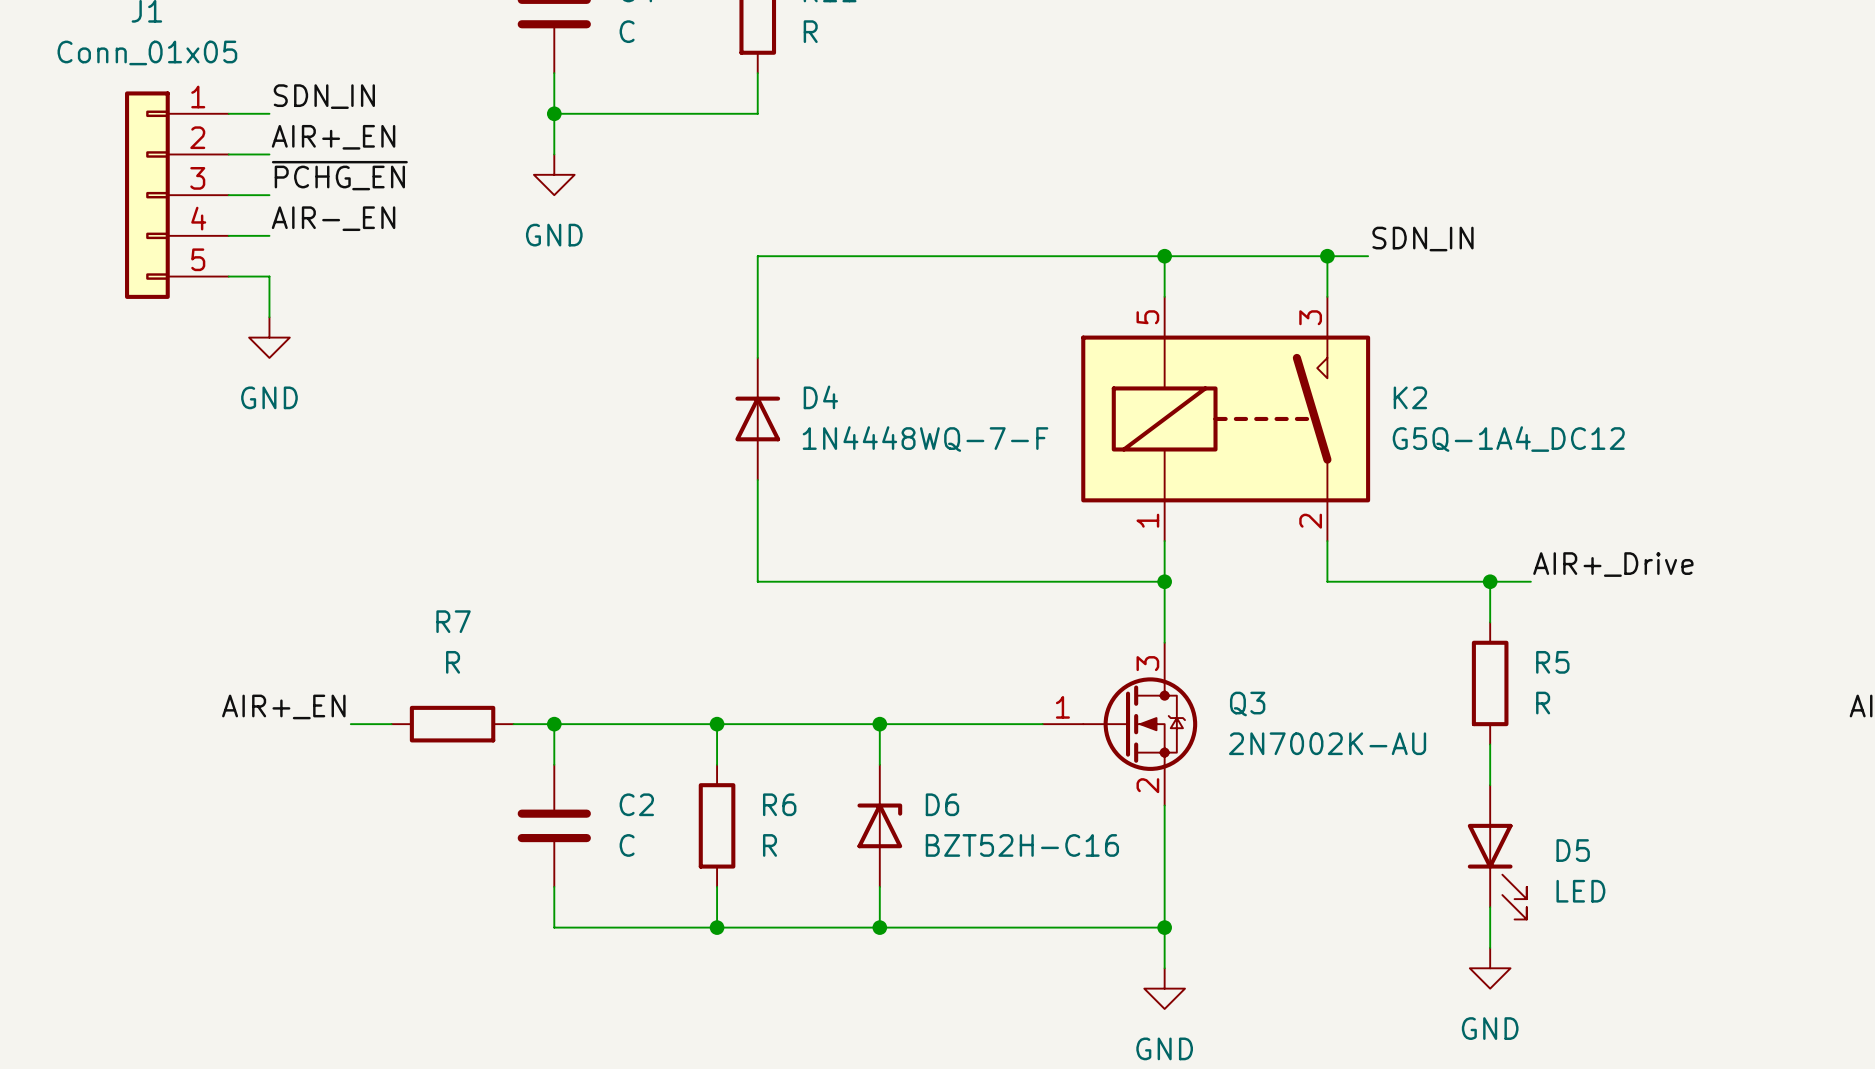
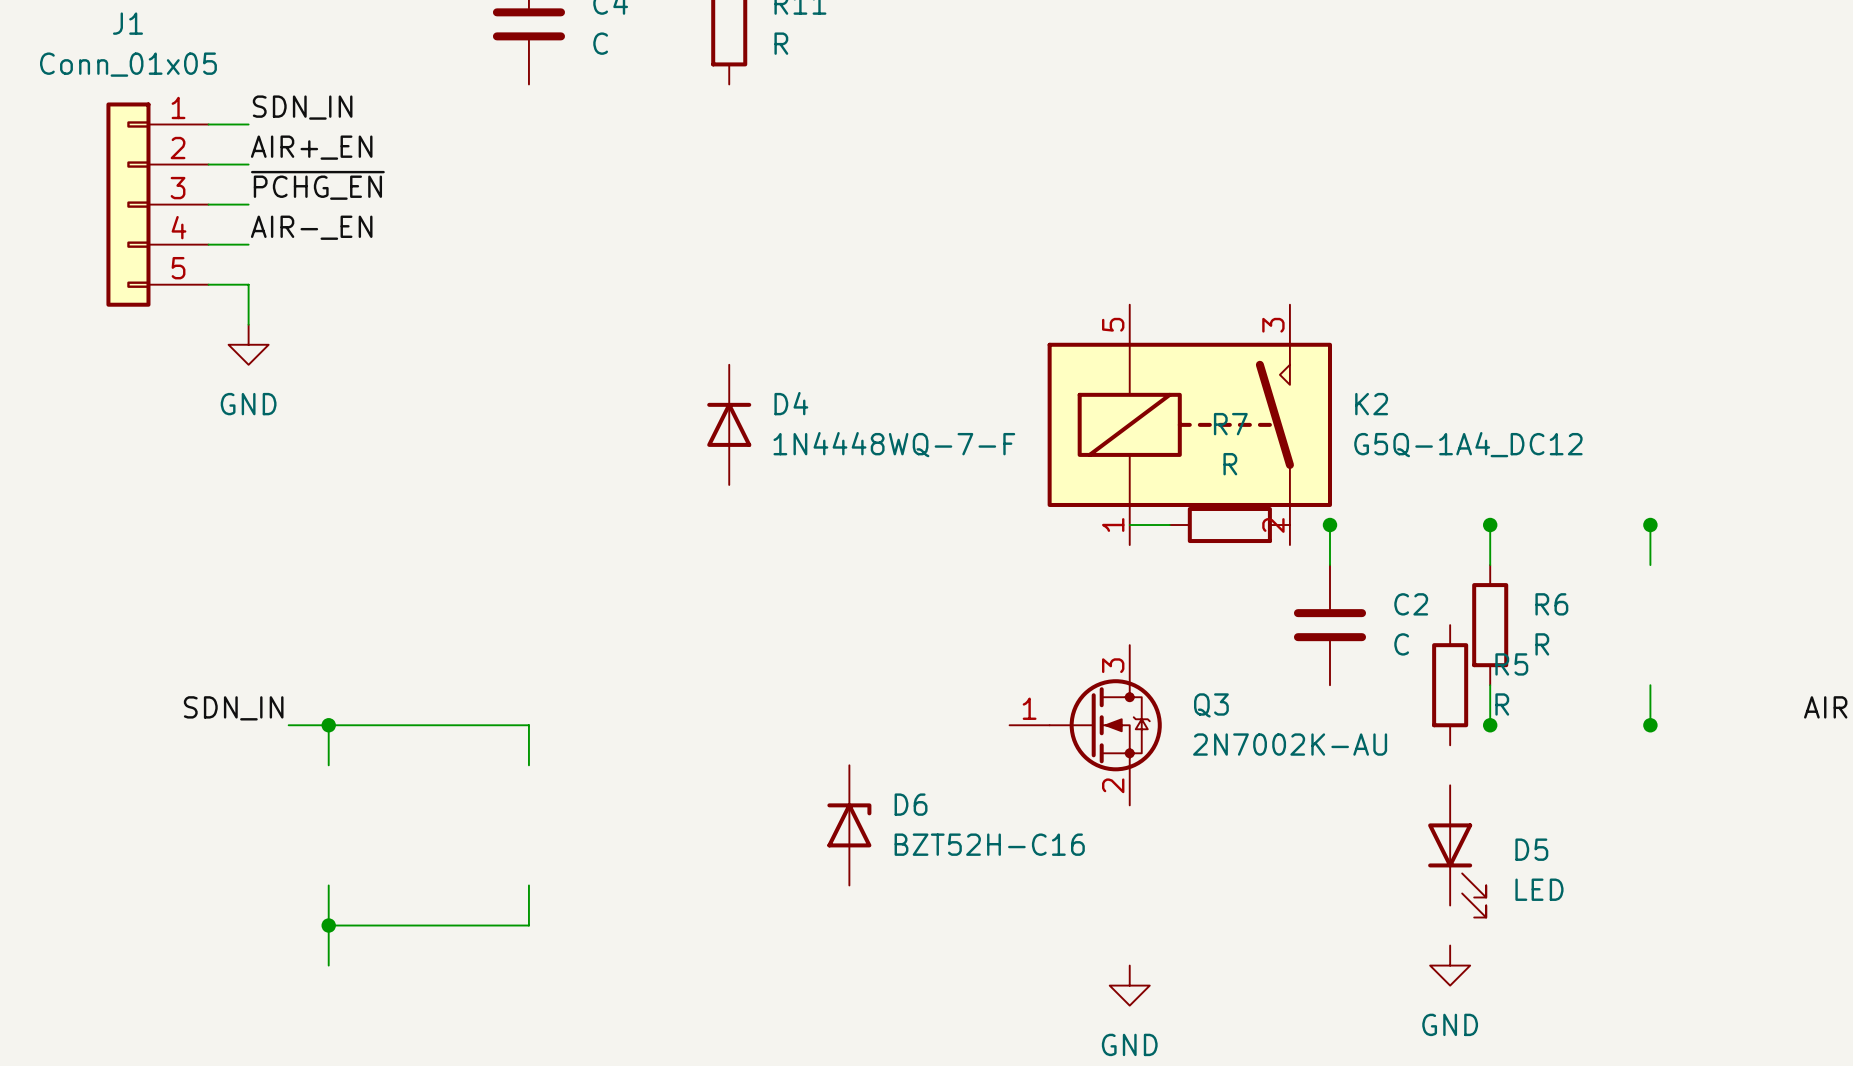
wire: (554, 73) (554, 154) -> none
wire: (757, 73) (757, 113) (554, 113) -> none
junction: (554, 113) -> none
power symbol: GND (554, 174) -> none
label: SDN_IN (1422, 239) -> none
wire: (1164, 256) (1164, 296) -> (1329, 525) (1329, 565)
junction: (1164, 256) -> none
wire: (1327, 256) (1327, 296) -> none
junction: (1327, 256) -> none
wire: (1368, 256) (757, 256) (757, 357) -> none
wire: (757, 480) (757, 581) (1164, 581) -> none
wire: none -> (1129, 525) (1169, 525)
junction: none -> (1329, 525)
junction: none -> (1490, 525)
wire: none -> (1650, 525) (1650, 565)
junction: none -> (1650, 525)
wire: (1164, 541) (1164, 642) -> none
wire: (1327, 541) (1327, 581) (1530, 581) -> none
label: AIR+_Drive (1613, 564) -> none
junction: (1164, 581) -> none
wire: (1490, 581) (1490, 622) -> (1490, 525) (1490, 565)
junction: (1490, 581) -> none
label: none -> SDN_IN (233, 708)
label: AIR+_EN (283, 706) -> none
wire: none -> (288, 725) (328, 725) (328, 765)
junction: none -> (328, 725)
wire: none -> (368, 725) (488, 725)
R7 position: (452, 724) -> (1229, 525)
wire: (554, 724) (1042, 724) -> none
junction: (554, 724) -> none
wire: (717, 724) (717, 764) -> none
junction: (717, 724) -> none
wire: (879, 724) (879, 764) -> none
junction: (879, 724) -> none
junction: none -> (1490, 725)
junction: none -> (1650, 725)
wire: (1490, 744) (1490, 785) -> (1490, 685) (1490, 725)
wire: (1164, 805) (1164, 968) -> none
C2 position: (554, 825) -> (1329, 625)
R6 position: (717, 825) -> (1490, 625)
wire: none -> (328, 885) (328, 965)
wire: (717, 886) (717, 927) -> none
wire: (879, 886) (879, 927) -> none
wire: (1490, 907) (1490, 947) -> (1650, 685) (1650, 725)
junction: none -> (328, 925)
wire: (554, 927) (1164, 927) -> (528, 925) (328, 925)
junction: (717, 927) -> none
junction: (879, 927) -> none
junction: (1164, 927) -> none

